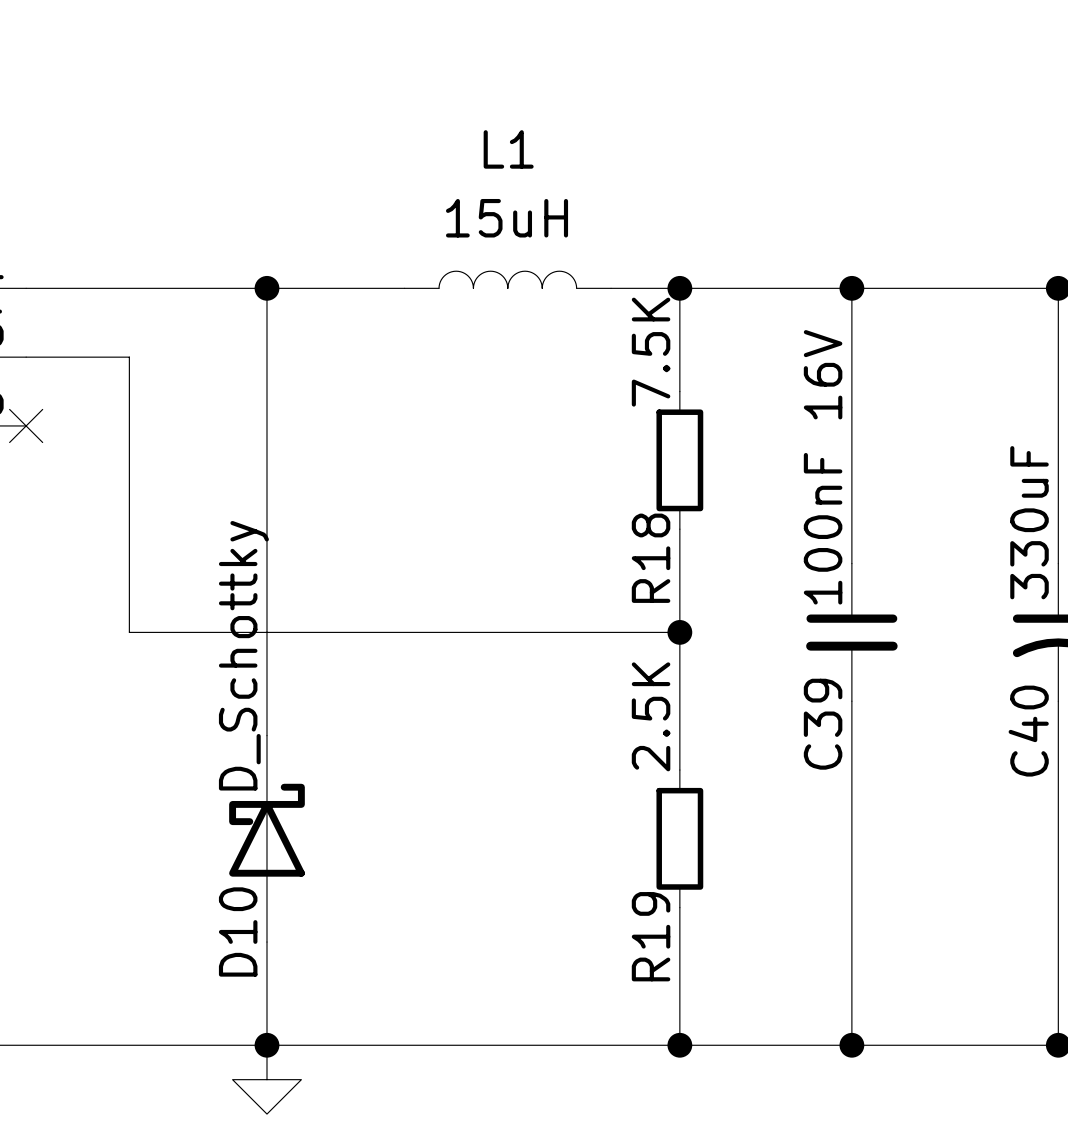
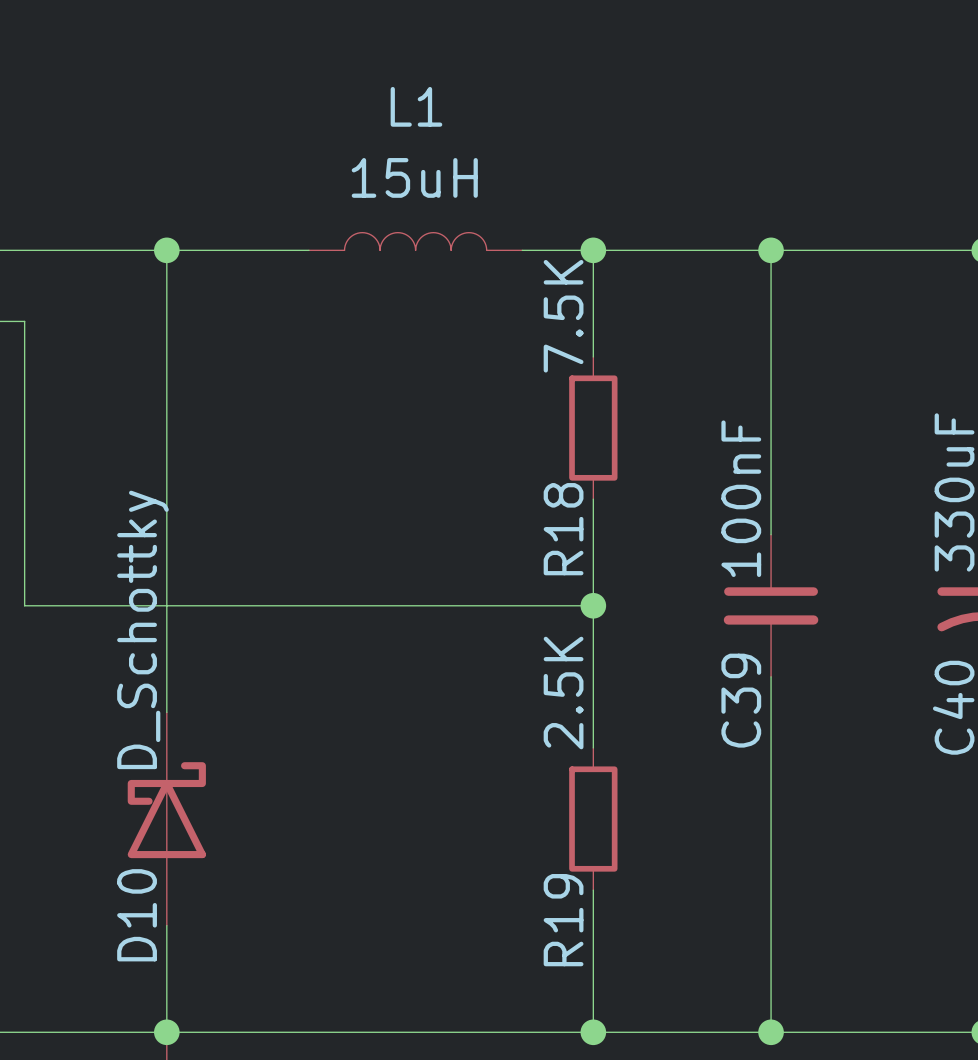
C39 value: 100nF 16V (823, 467) -> 100nF (741, 498)

